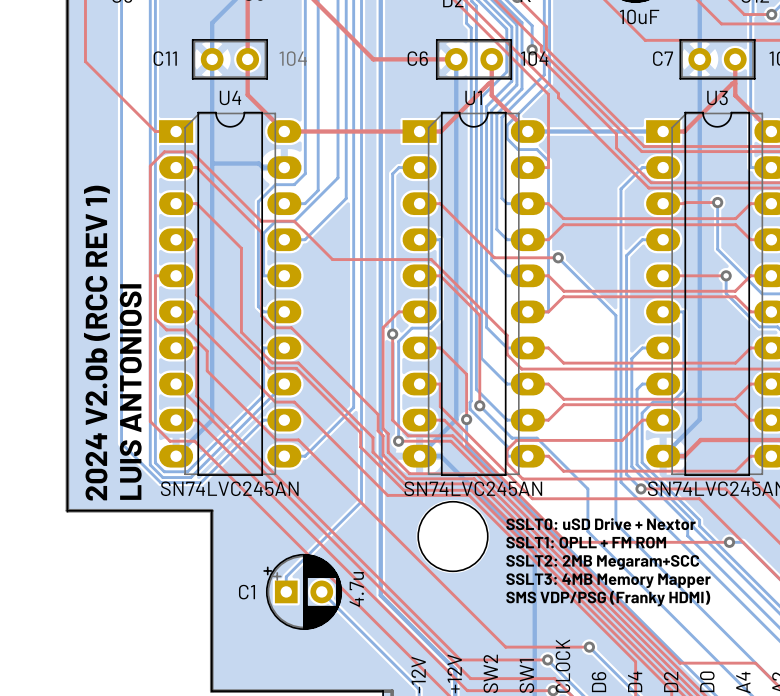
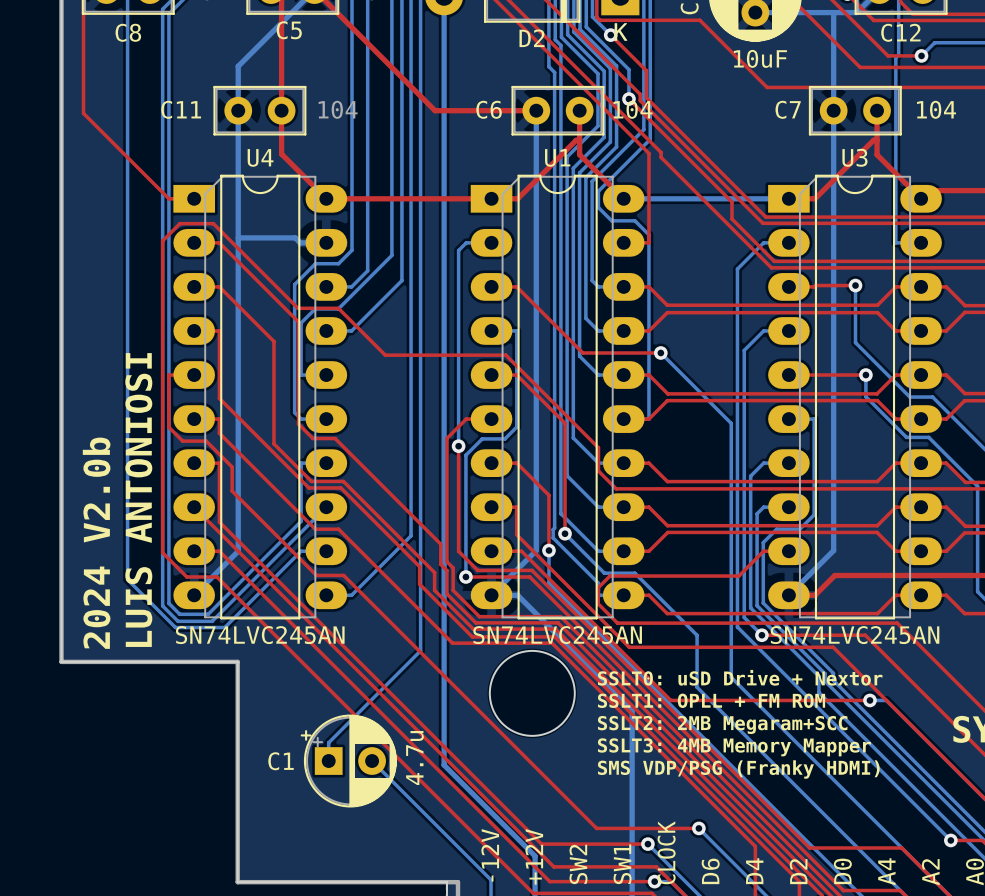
text: 2024 V2.0b (RCC REV 1) (96, 343) -> 2024 V2.0b (96, 543)

